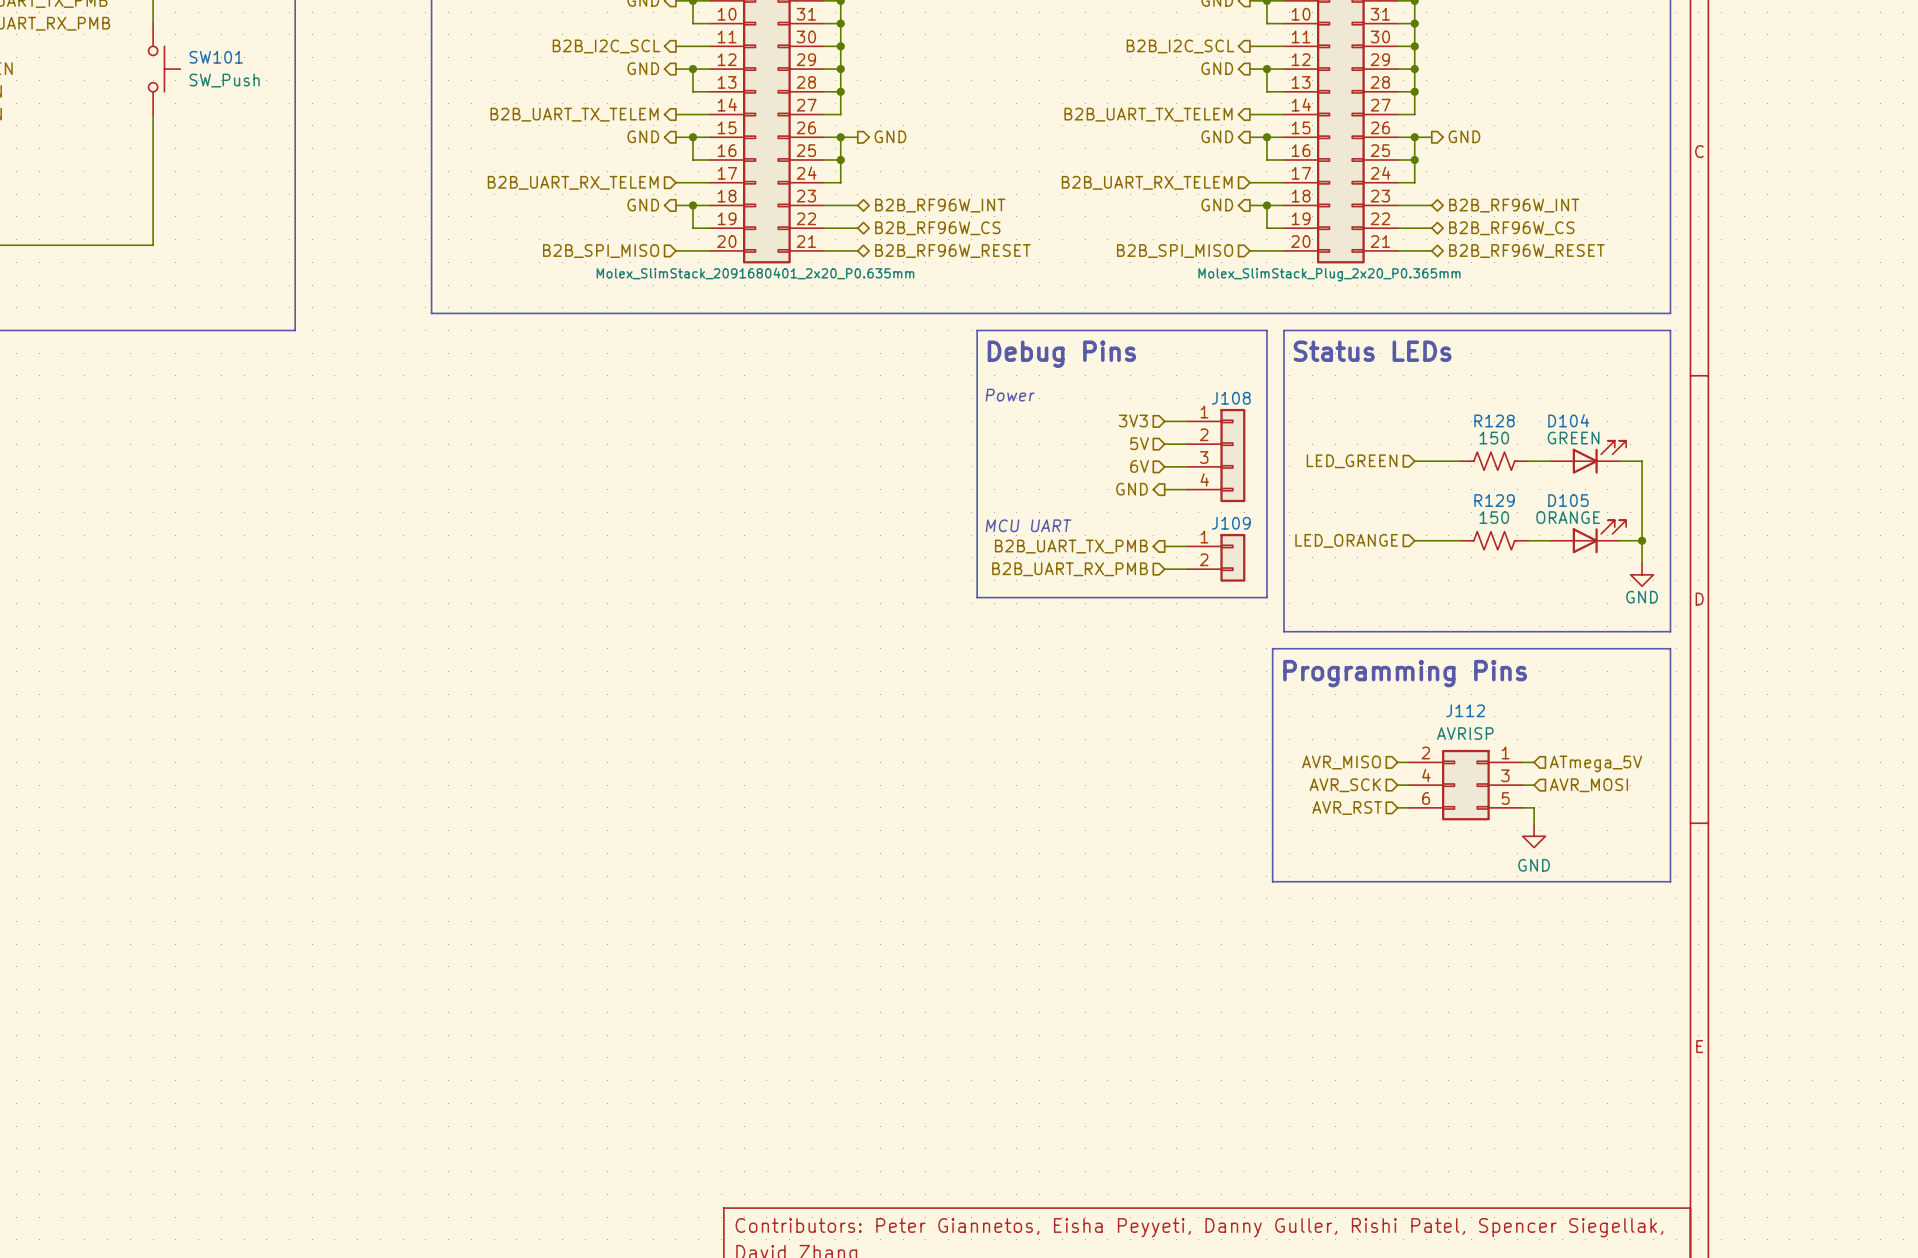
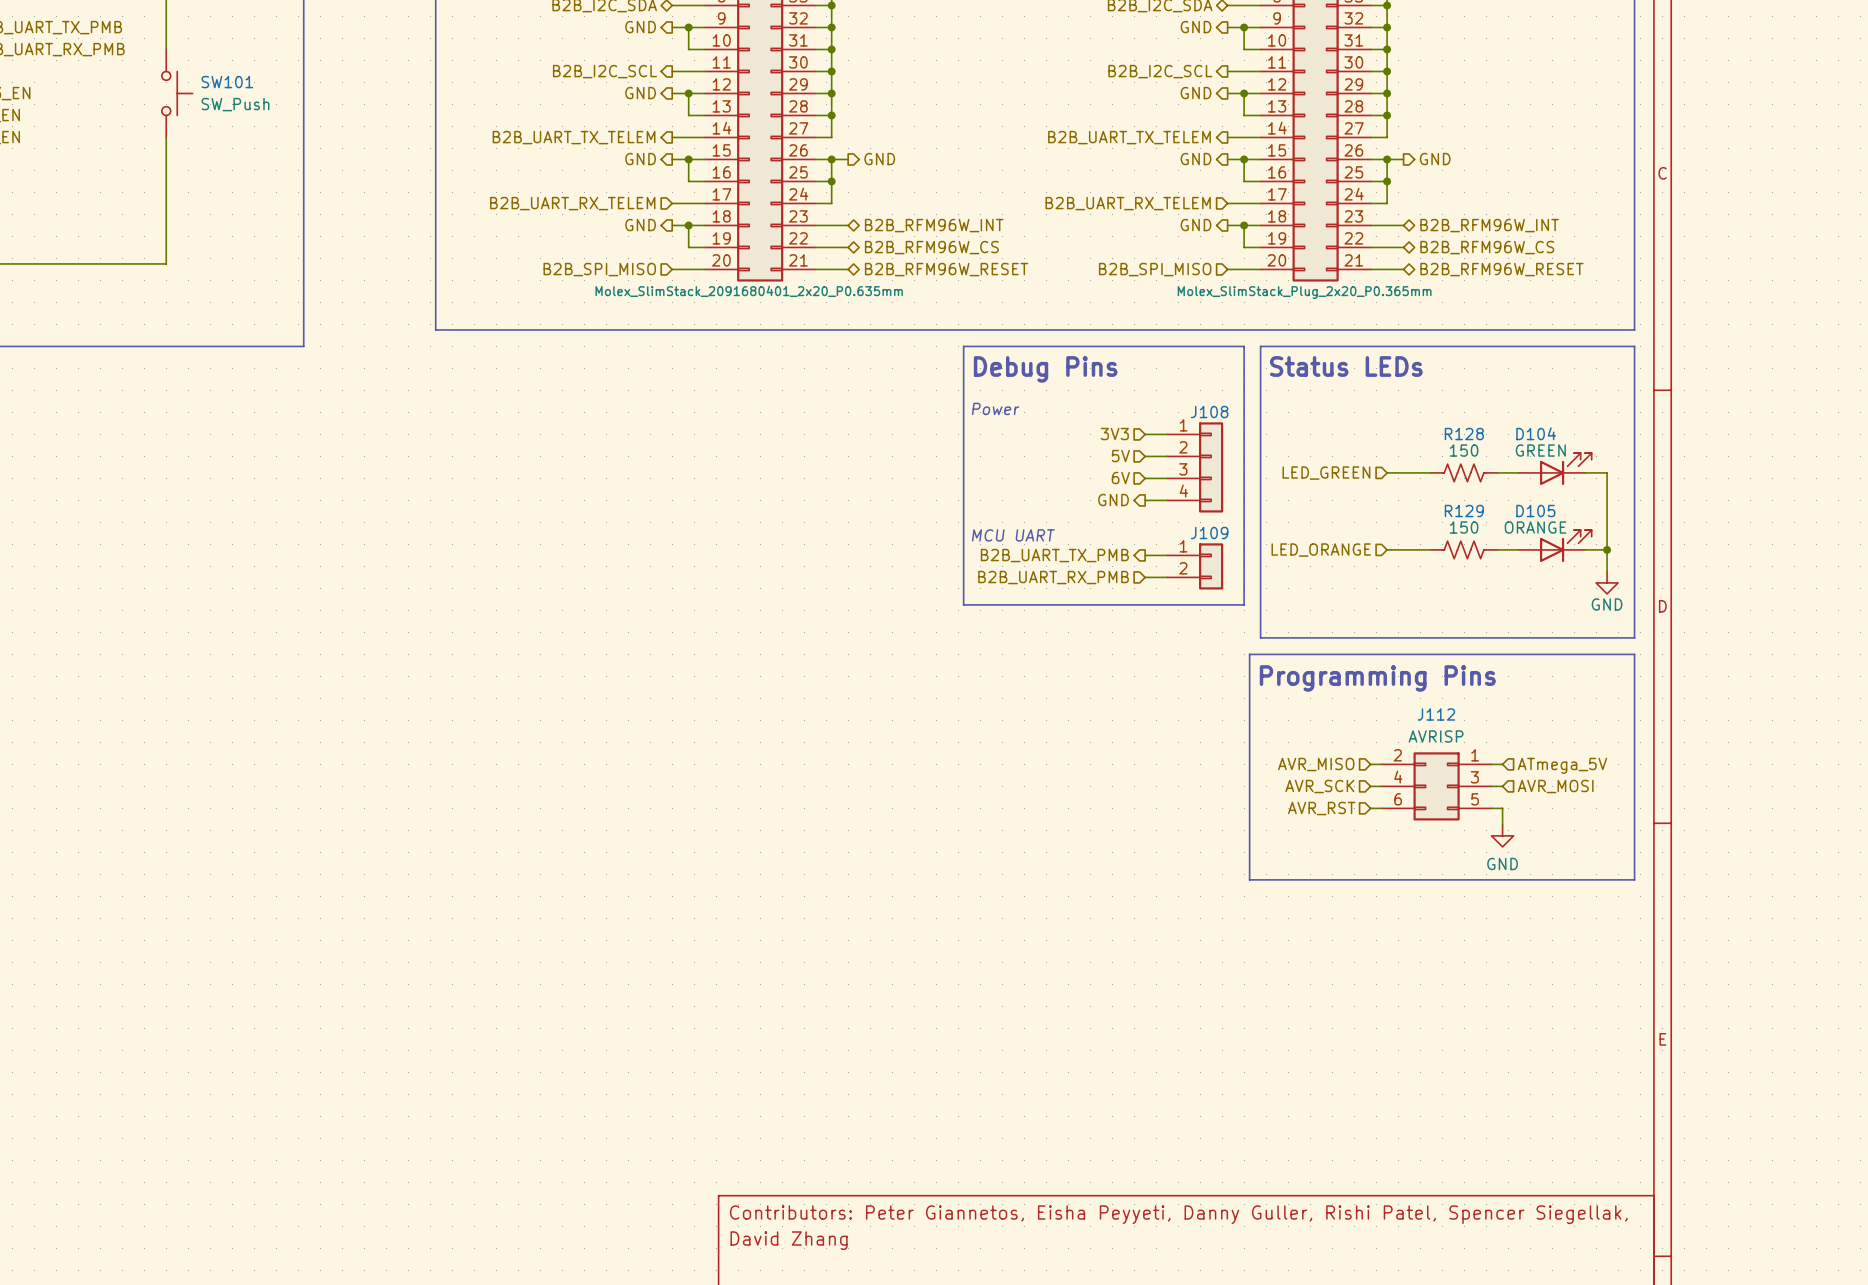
hierarchical label: B2B_RF96W_INT (940, 205) -> B2B_RFM96W_INT (934, 225)
hierarchical label: B2B_RF96W_INT (1514, 205) -> B2B_RFM96W_INT (1489, 225)
hierarchical label: B2B_RF96W_CS (937, 228) -> B2B_RFM96W_CS (931, 247)
hierarchical label: B2B_RF96W_CS (1511, 228) -> B2B_RFM96W_CS (1487, 247)
hierarchical label: B2B_RF96W_RESET (952, 251) -> B2B_RFM96W_RESET (946, 269)
hierarchical label: B2B_RF96W_RESET (1526, 251) -> B2B_RFM96W_RESET (1501, 269)

